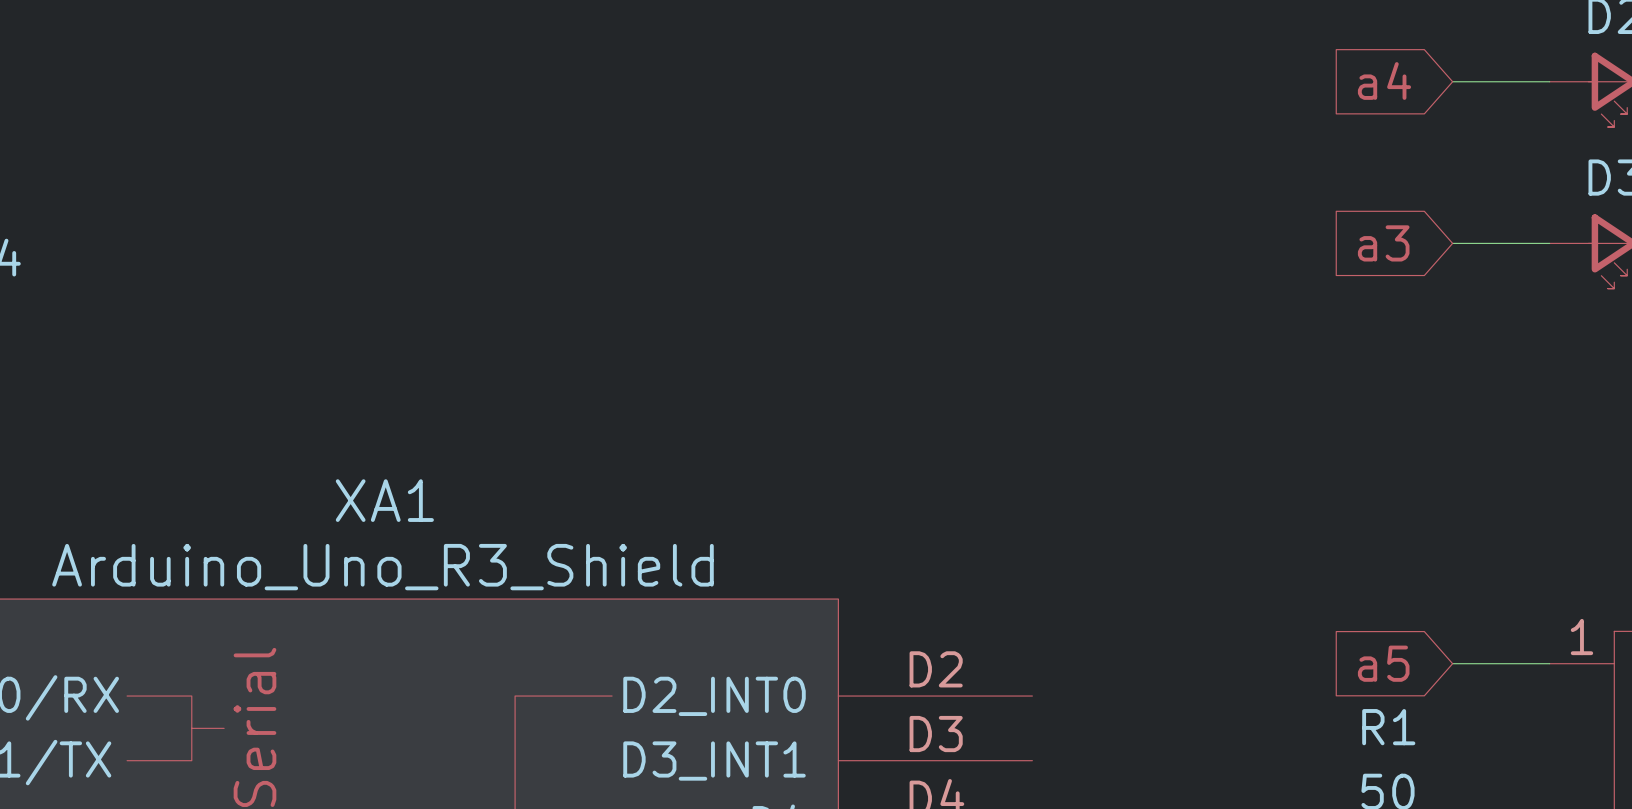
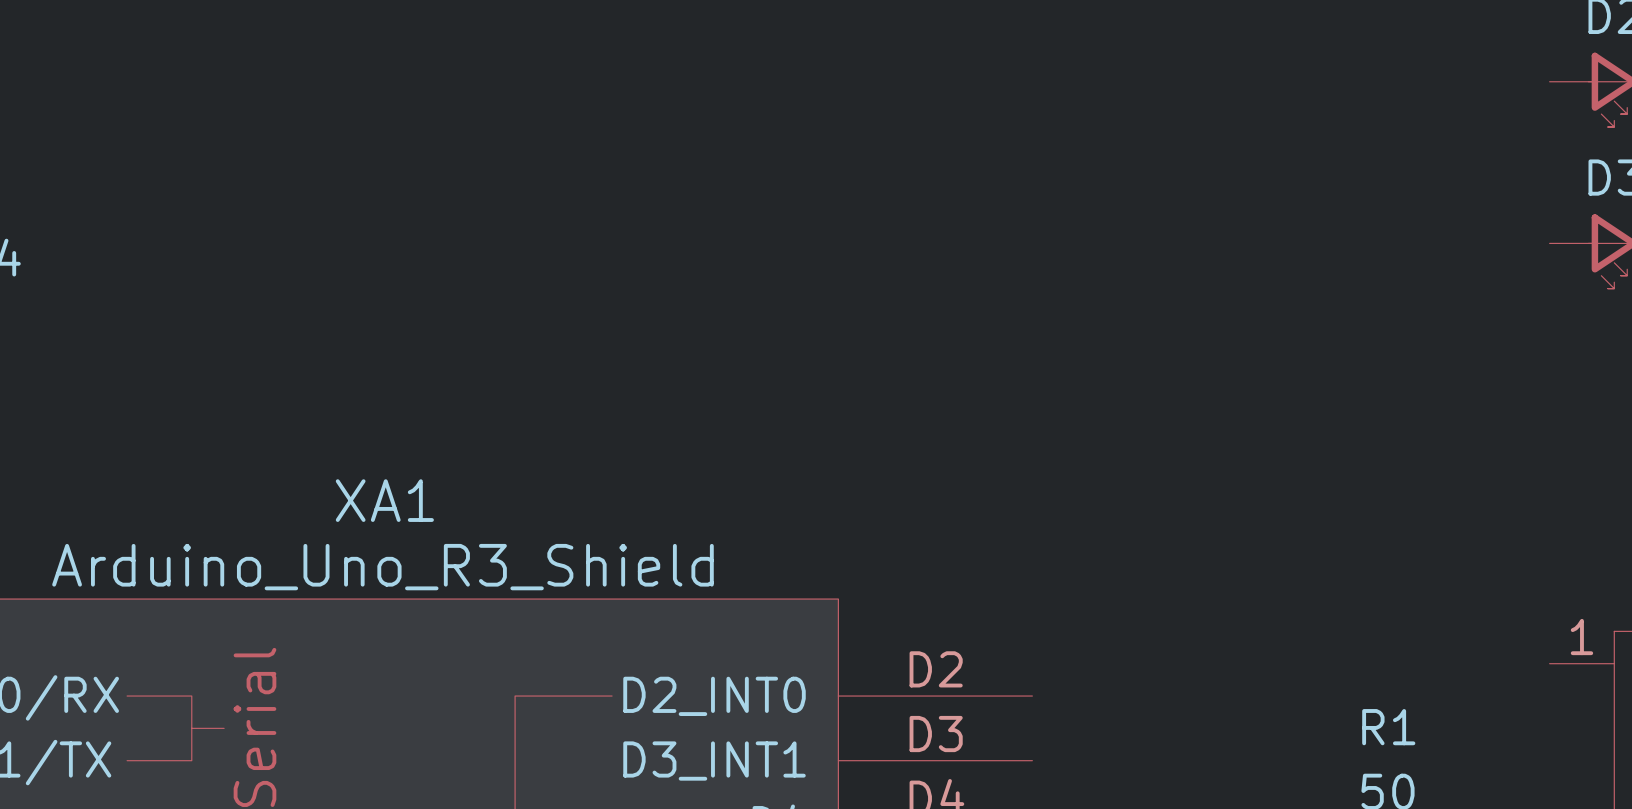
global label: a4 (1384, 80) -> none
wire: (1452, 81) (1549, 81) -> none
global label: a3 (1383, 243) -> none
wire: (1452, 243) (1549, 243) -> none
global label: a5 (1383, 663) -> none
wire: (1452, 663) (1549, 663) -> none

